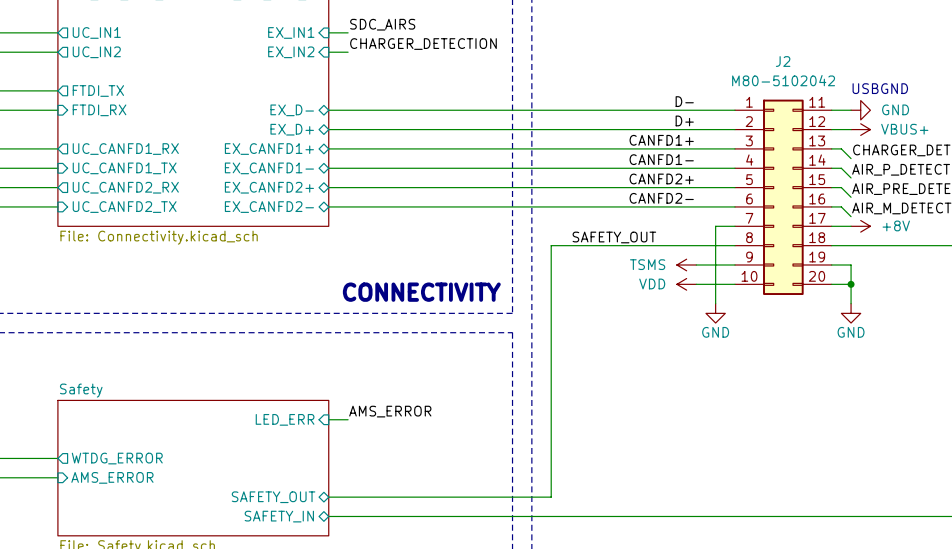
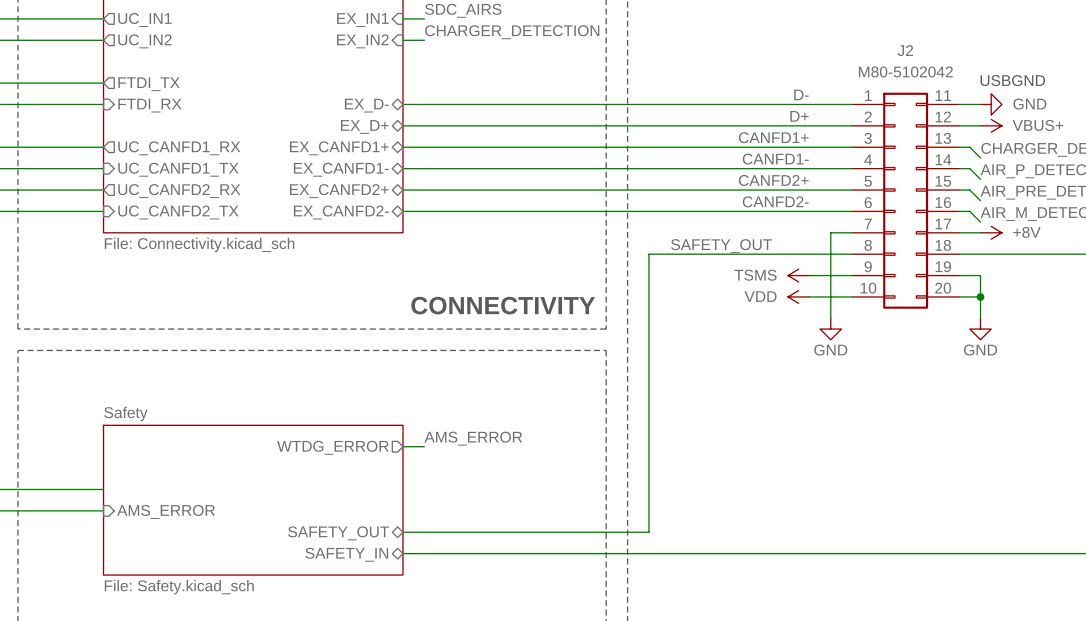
sheet pin shape: input (285, 419) -> output (332, 447)
sheet pin: LED_ERR (285, 419) -> WTDG_ERROR (332, 447)
sheet pin: WTDG_ERROR (117, 458) -> none

